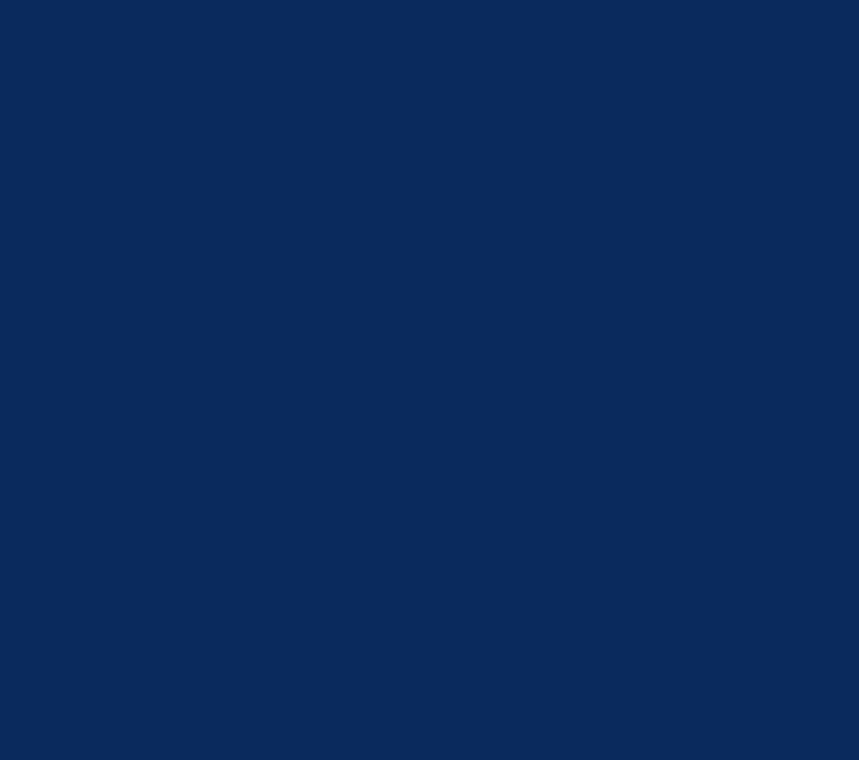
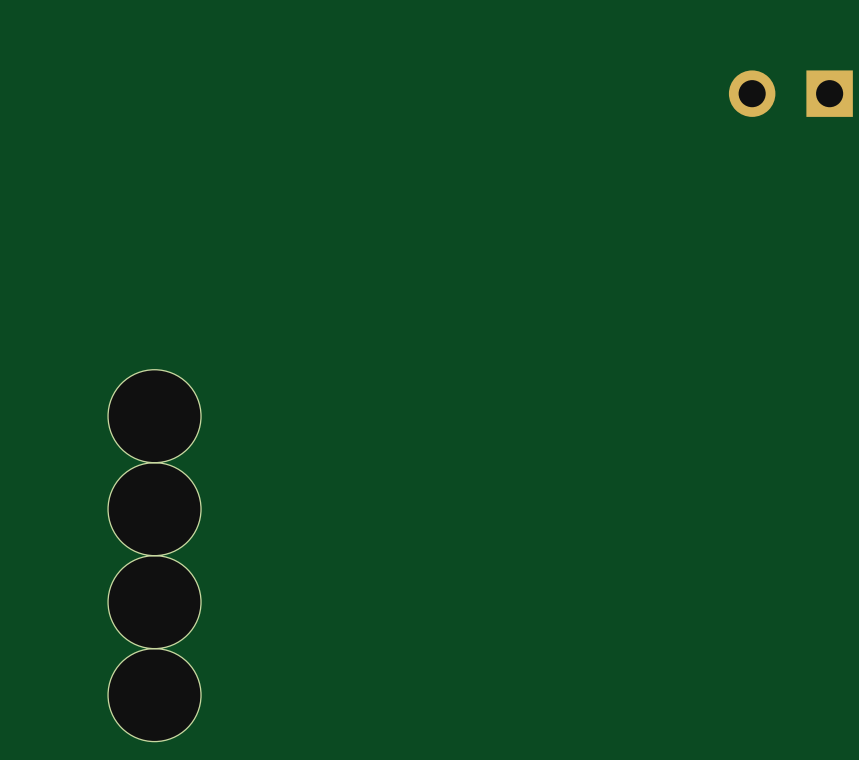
part: none -> (790, 93)
part: none -> (154, 416)
part: none -> (154, 509)
part: none -> (154, 602)
part: none -> (154, 695)

